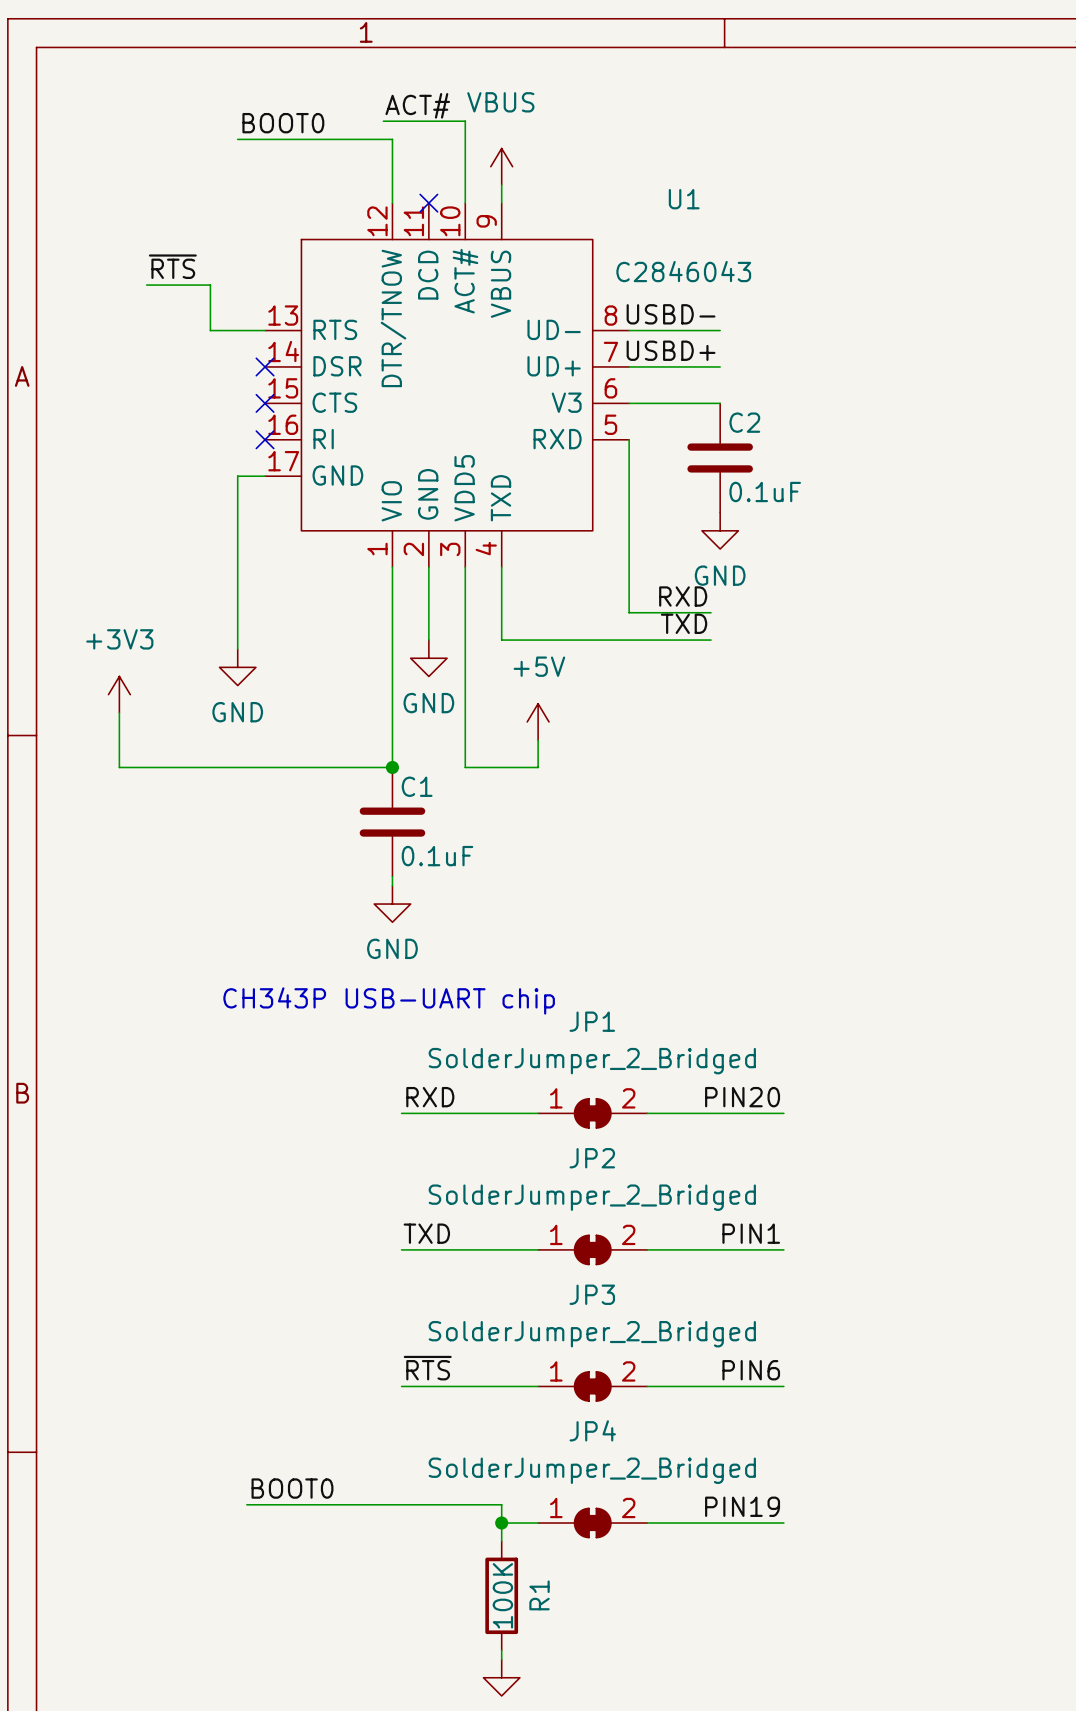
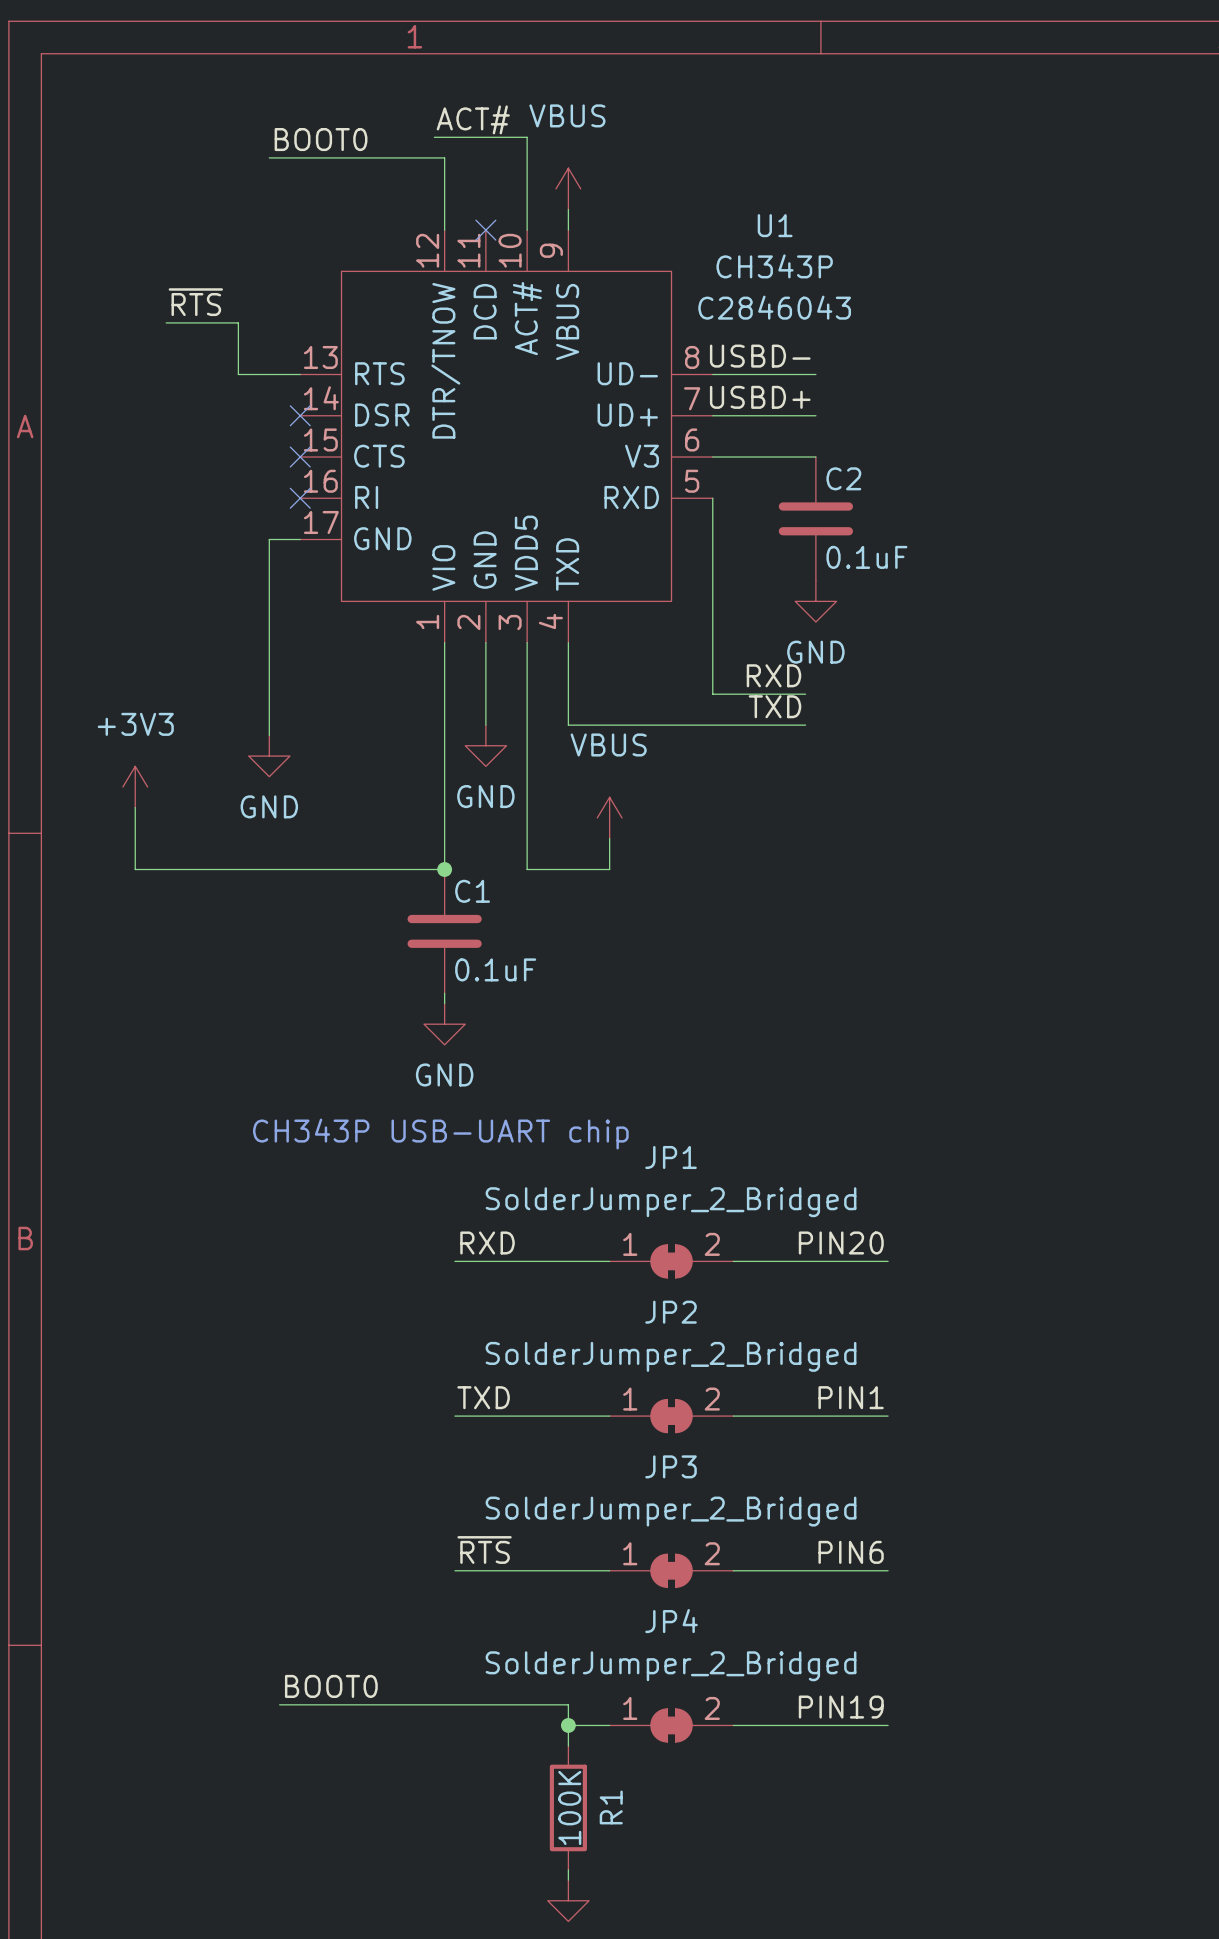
U1 value: none -> CH343P (774, 266)
power symbol: +5V (538, 721) -> VBUS (609, 817)

